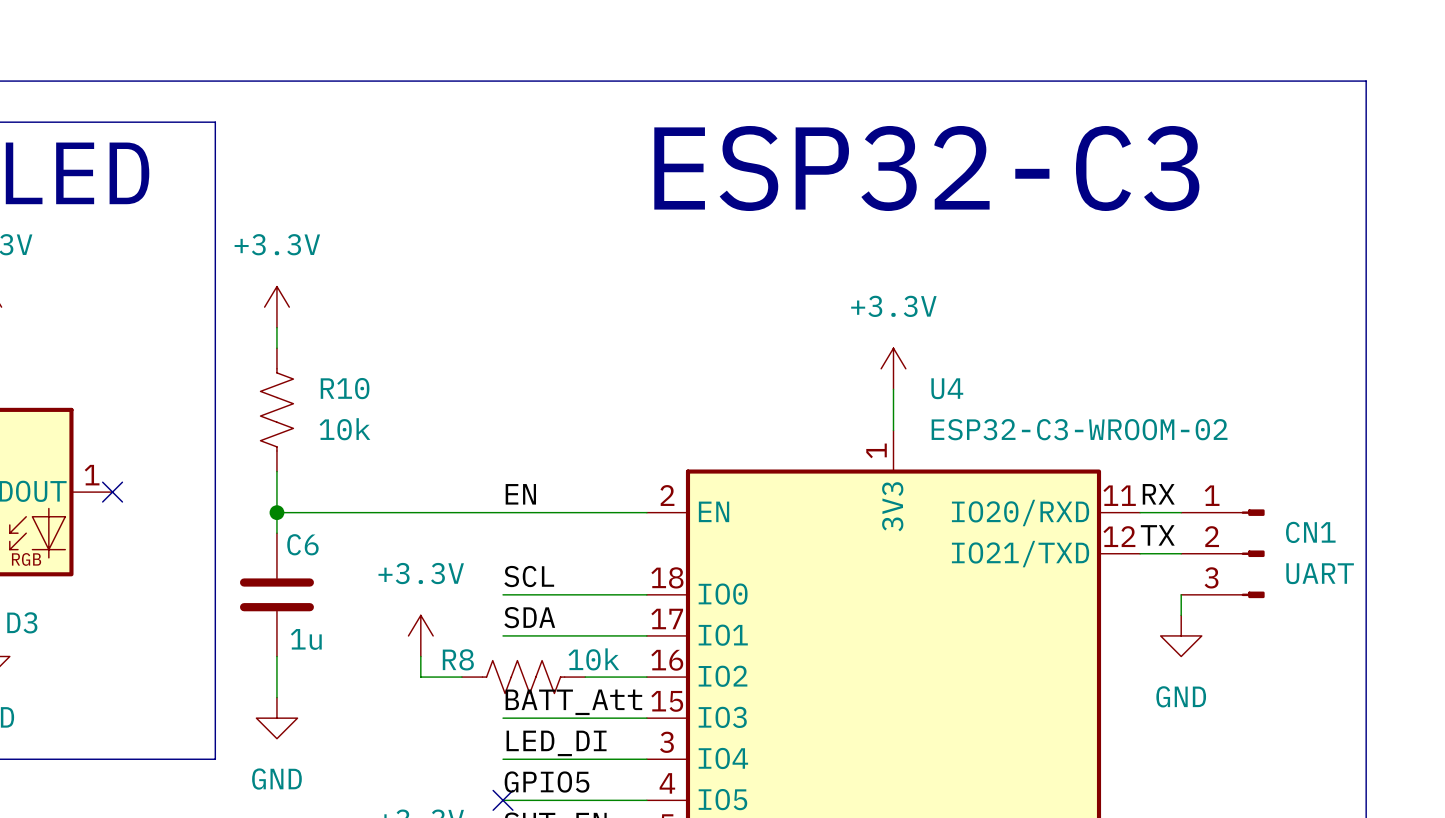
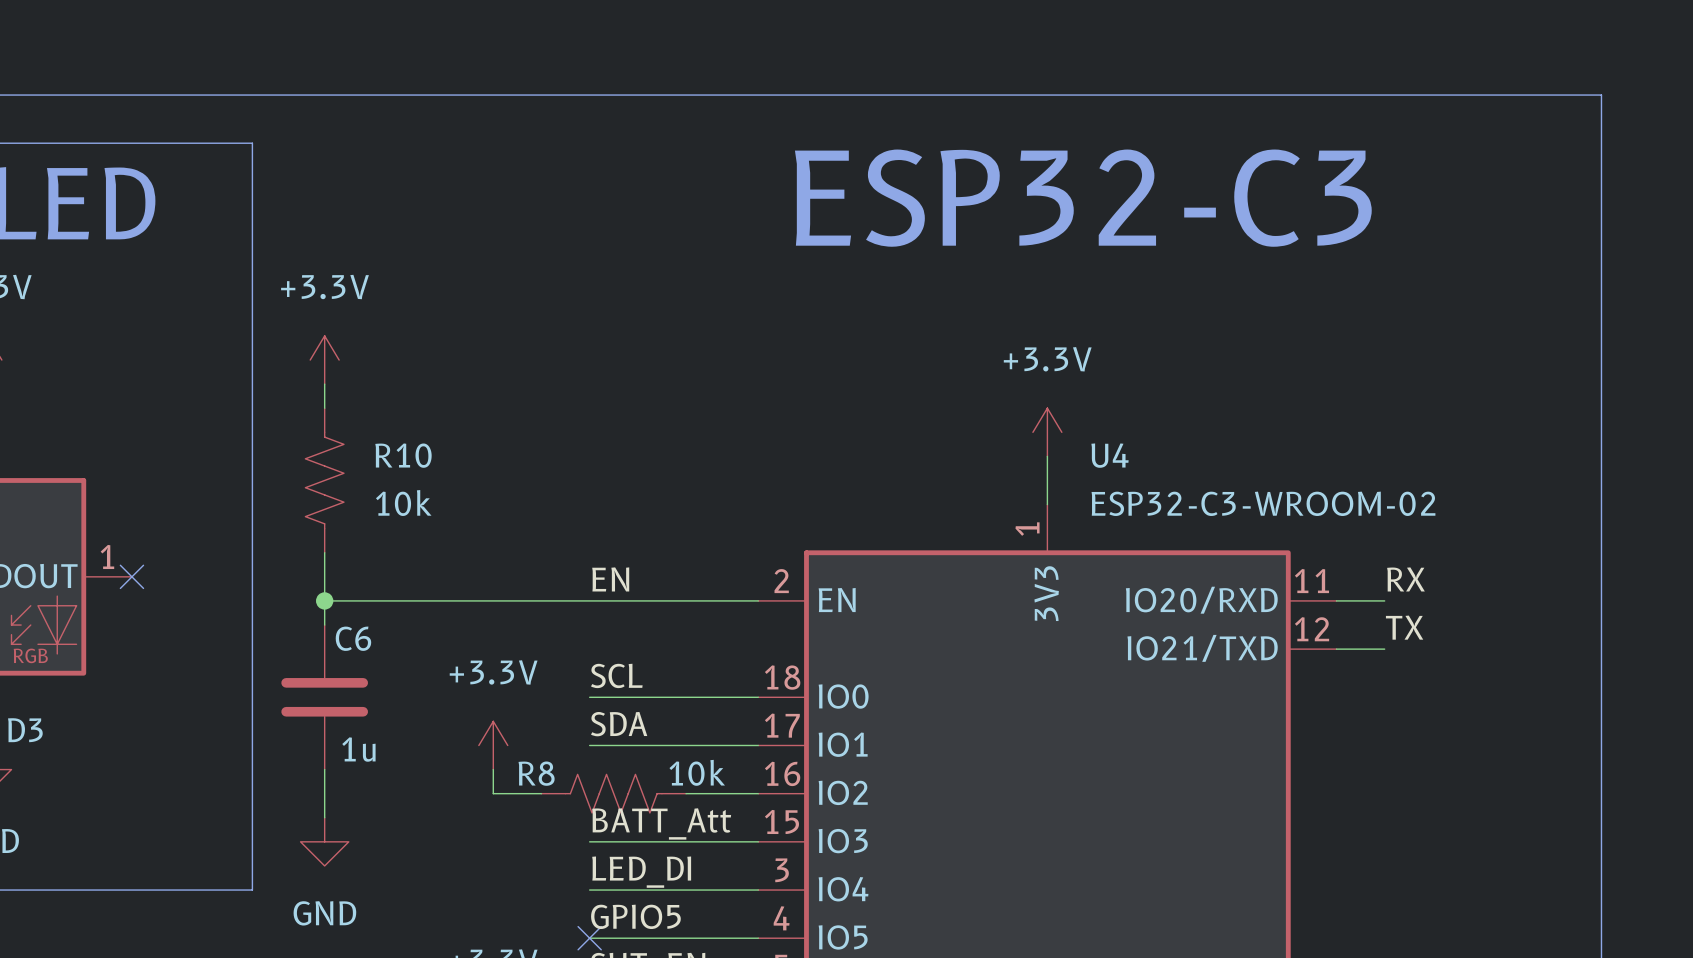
label position: RX (1158, 494) -> RX (1405, 579)
label position: TX (1157, 535) -> TX (1404, 627)
CN1: UART (1222, 553) -> none
wire: (1181, 594) (1181, 615) -> none
power symbol: GND (1181, 635) -> none

